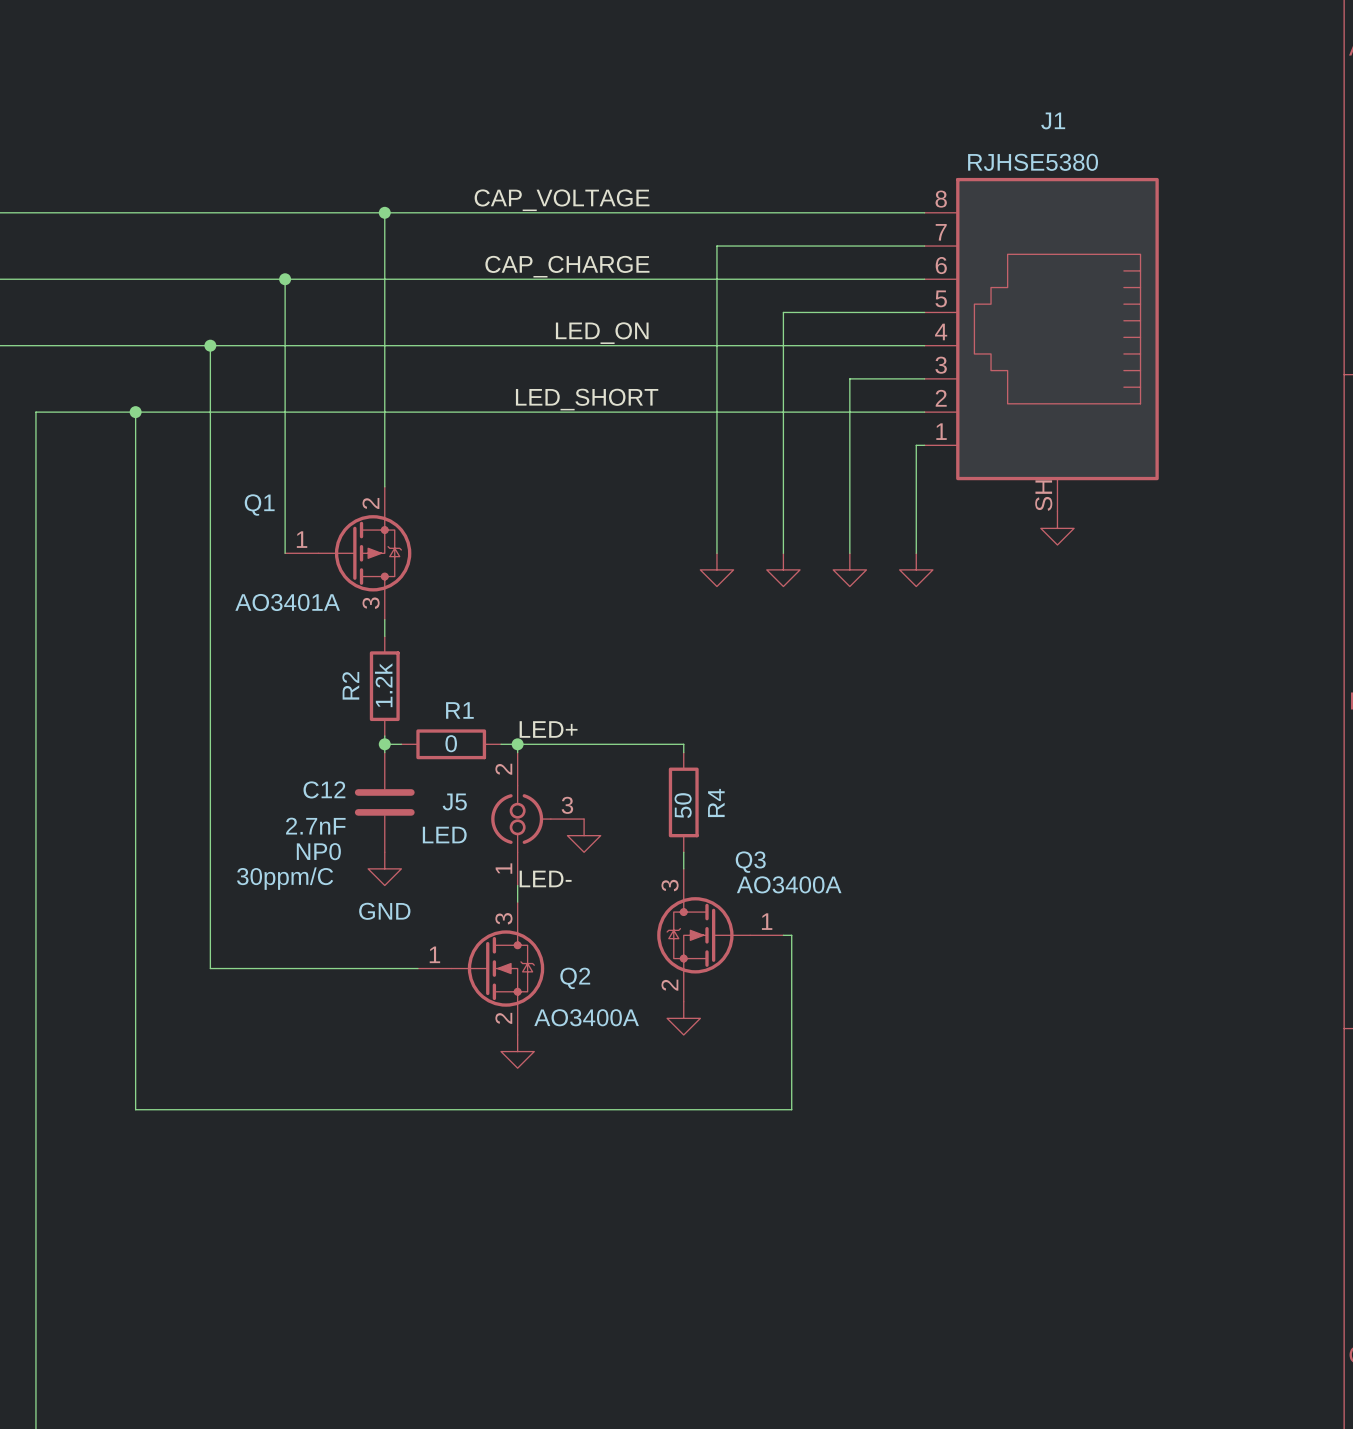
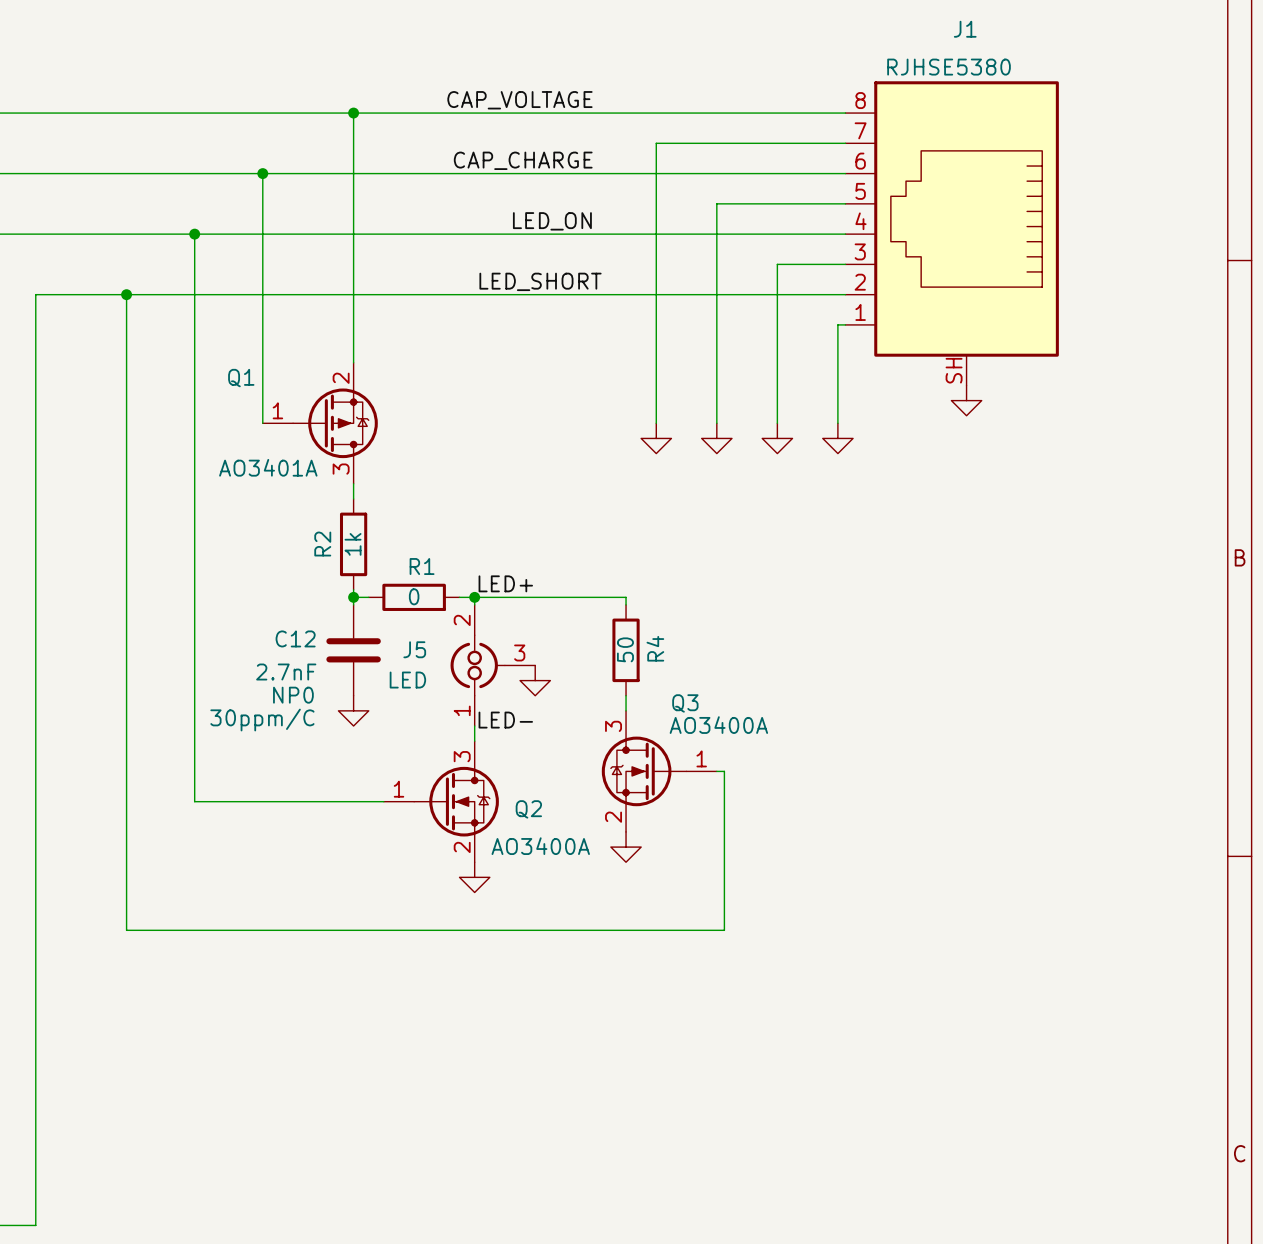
R2 value: 1.2k (383, 685) -> 1k (353, 544)
power symbol text: GND (384, 911) -> none

